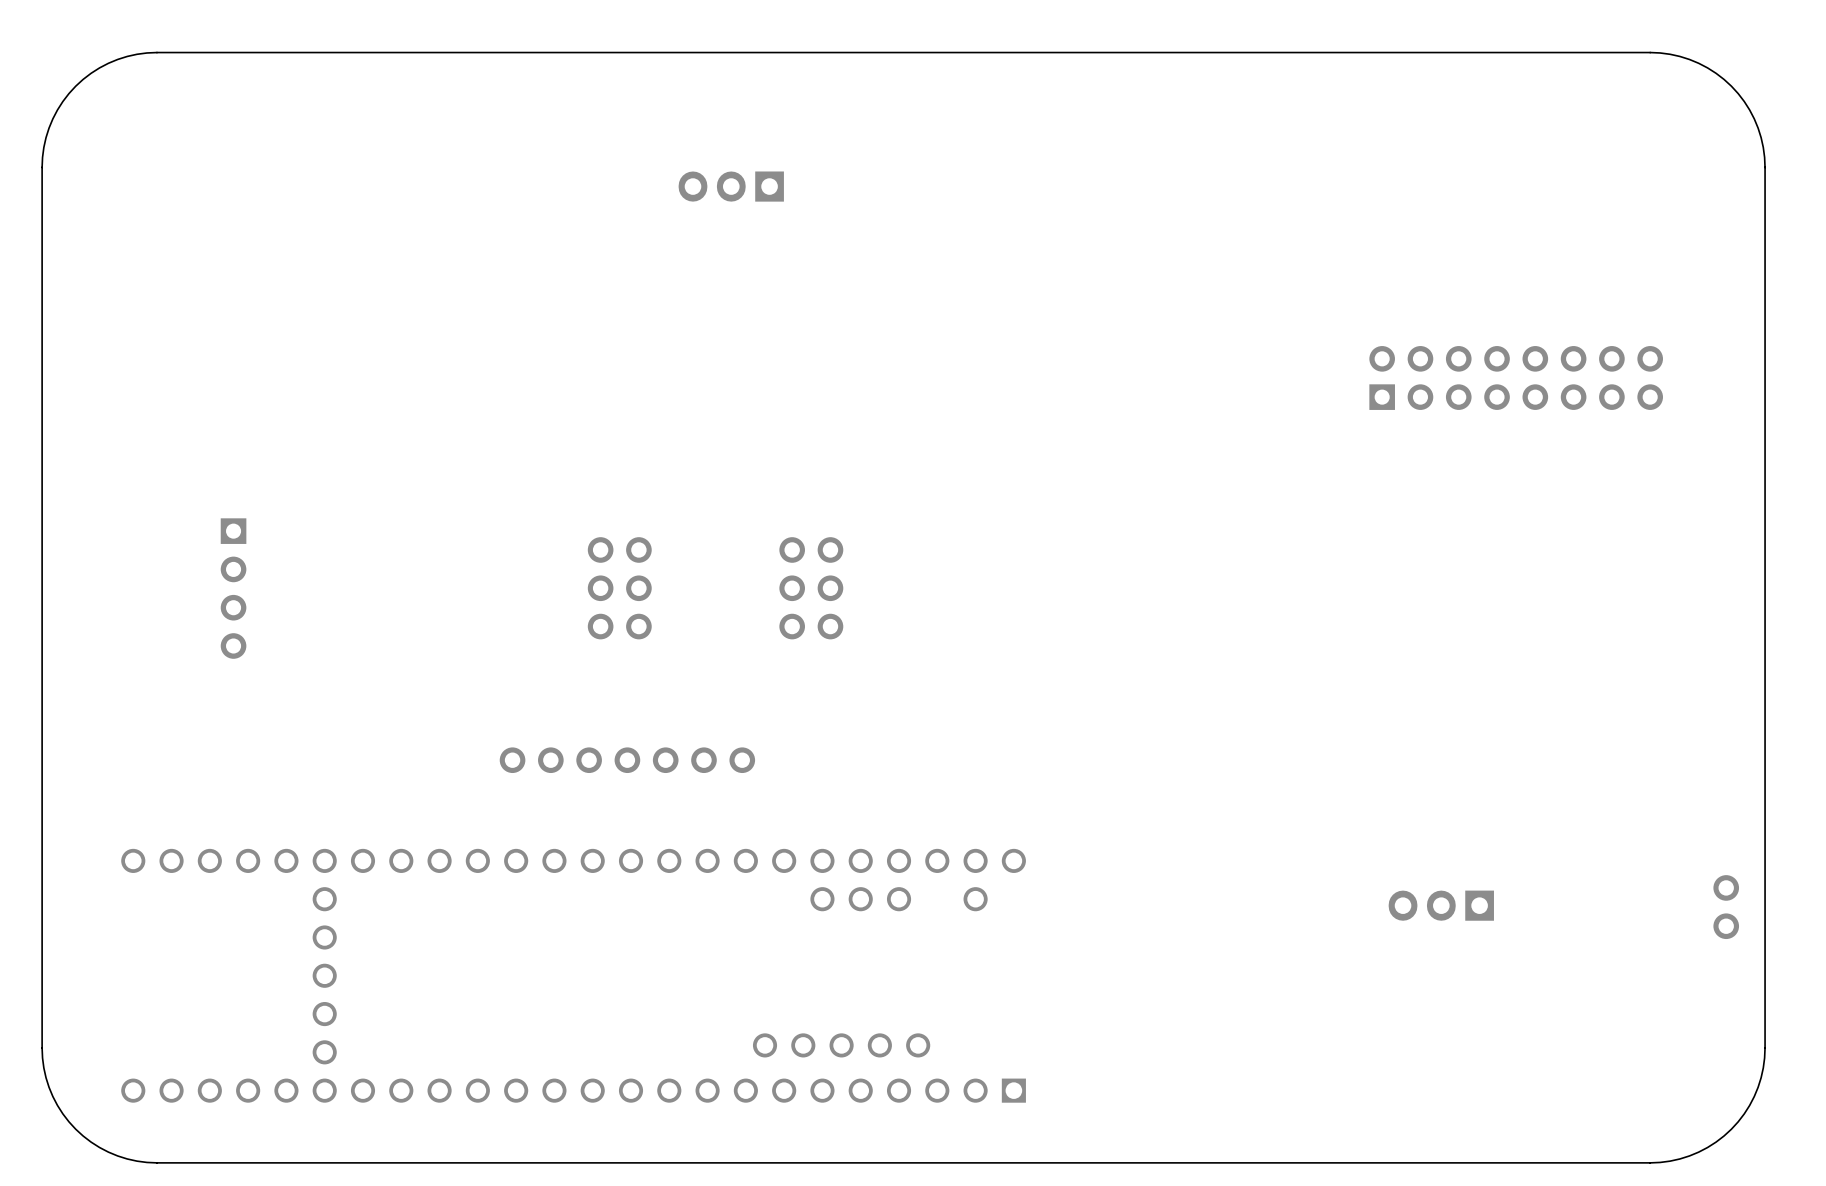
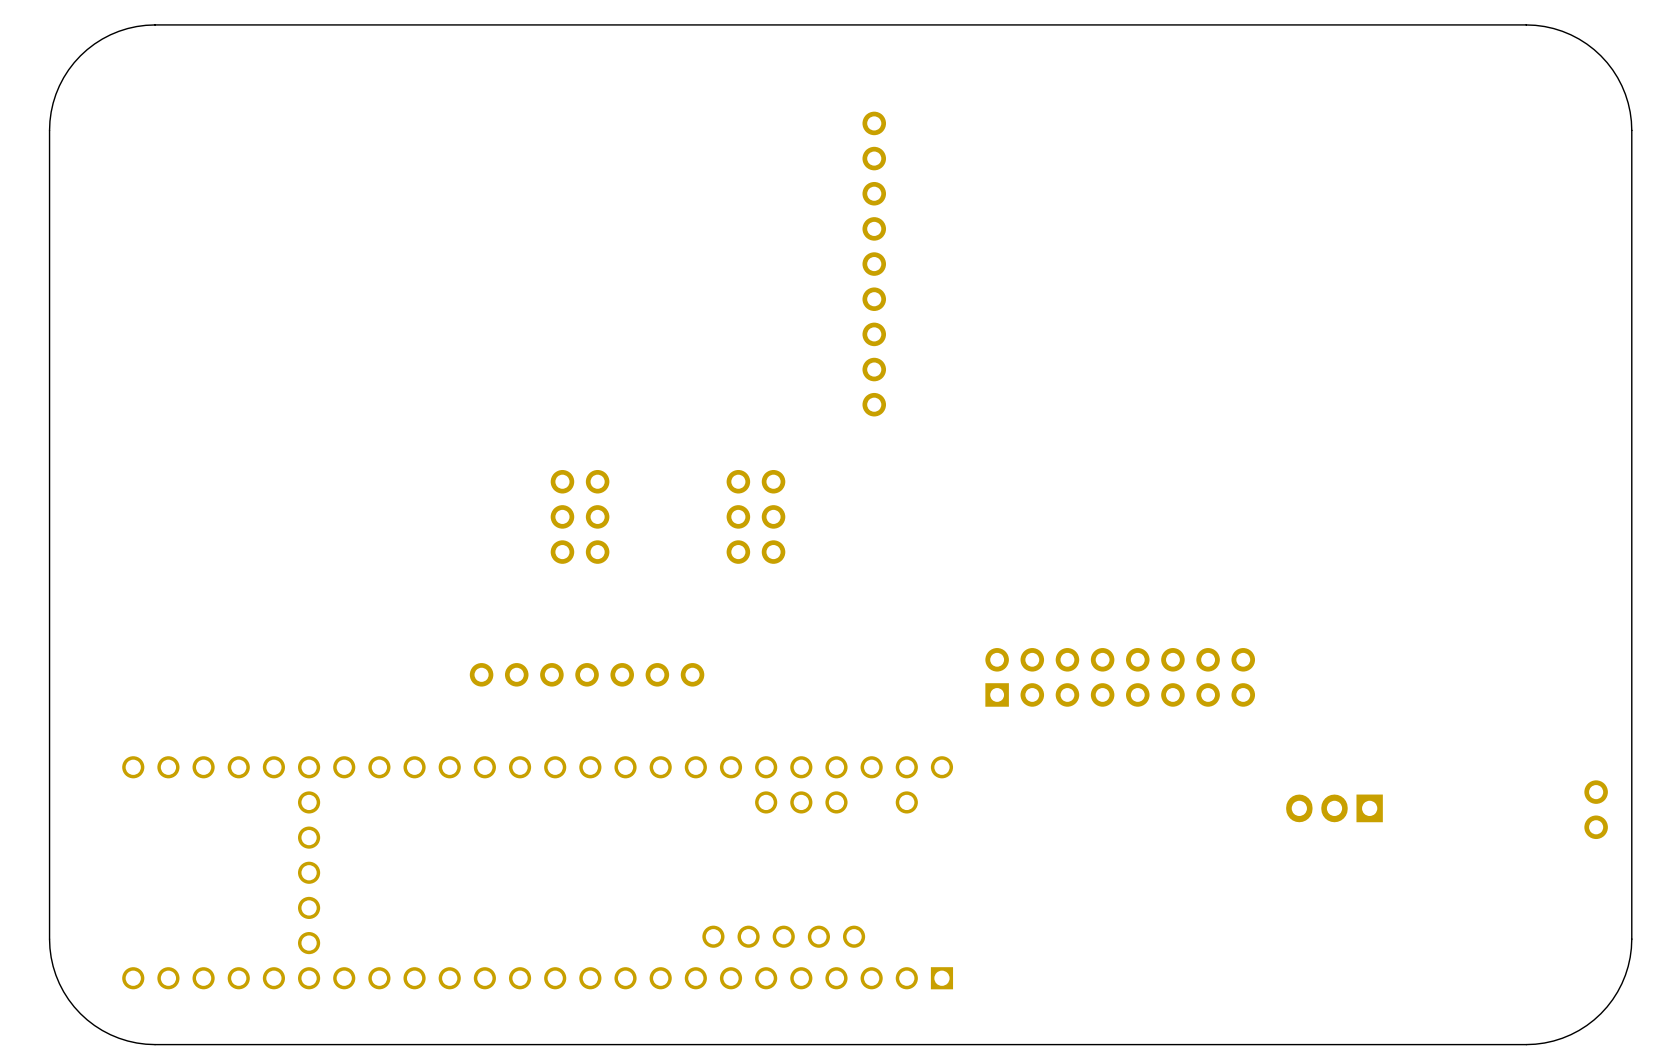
part: (731, 186) -> none
part: none -> (874, 264)
part: (1516, 377) -> none
part: (233, 588) -> none
part: none -> (1120, 677)

